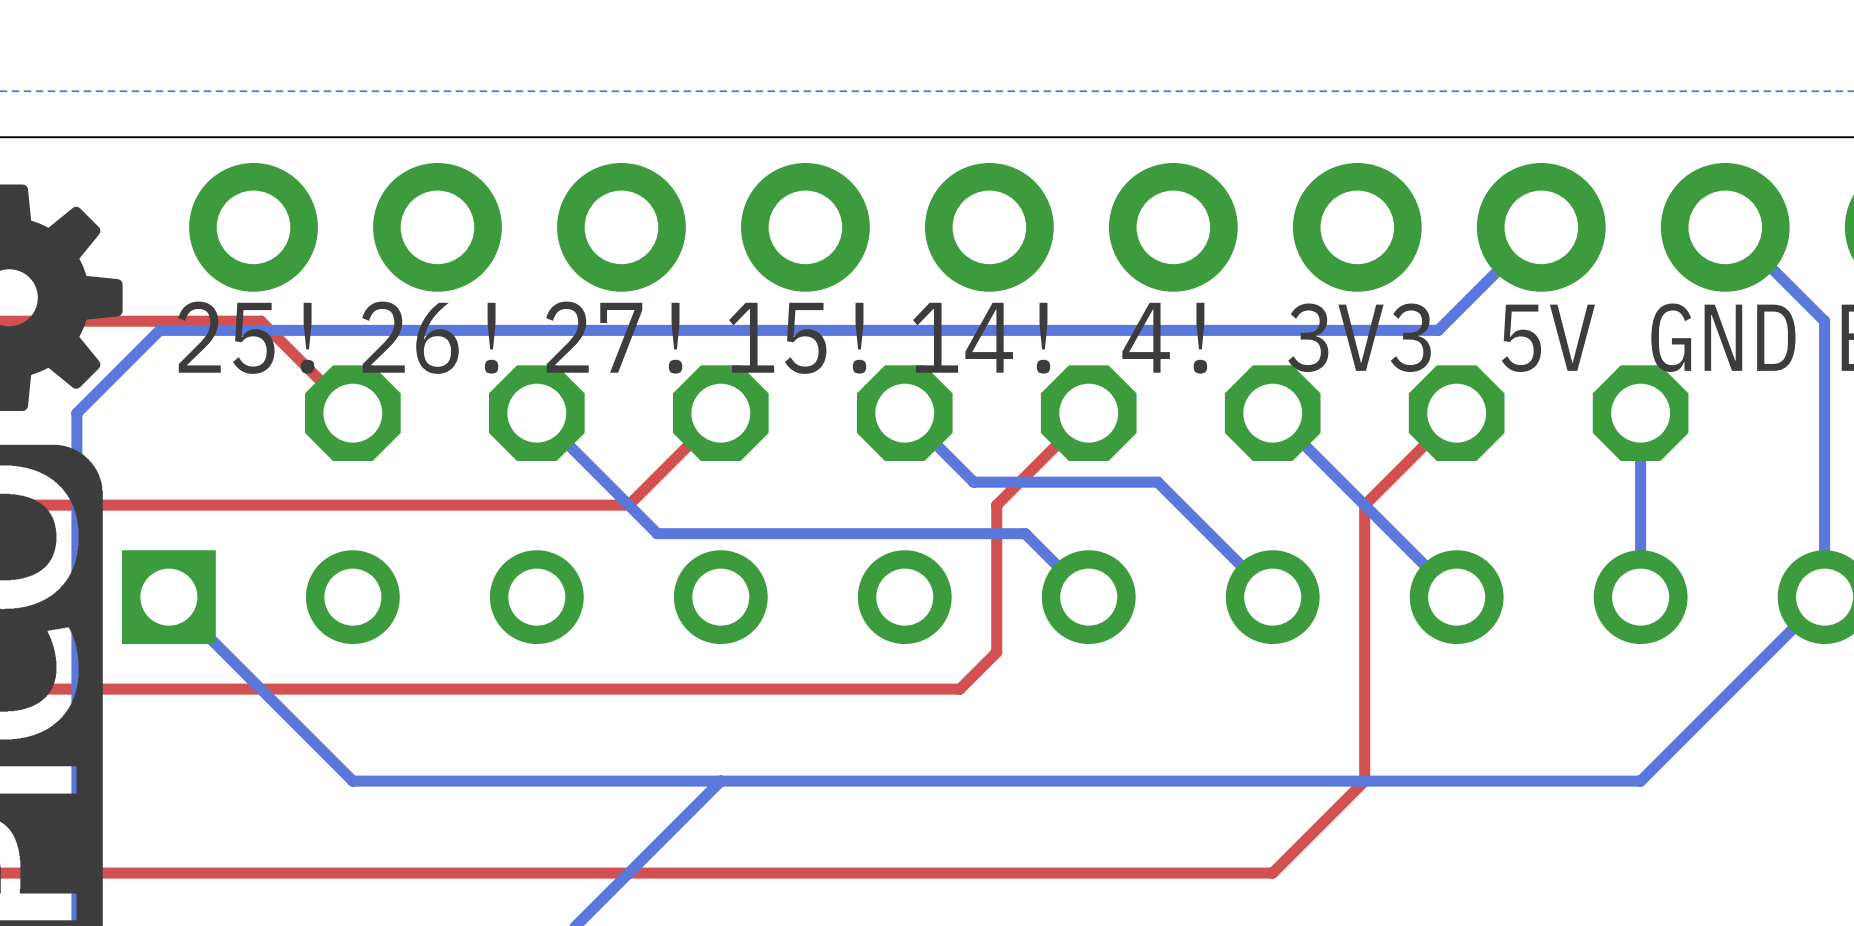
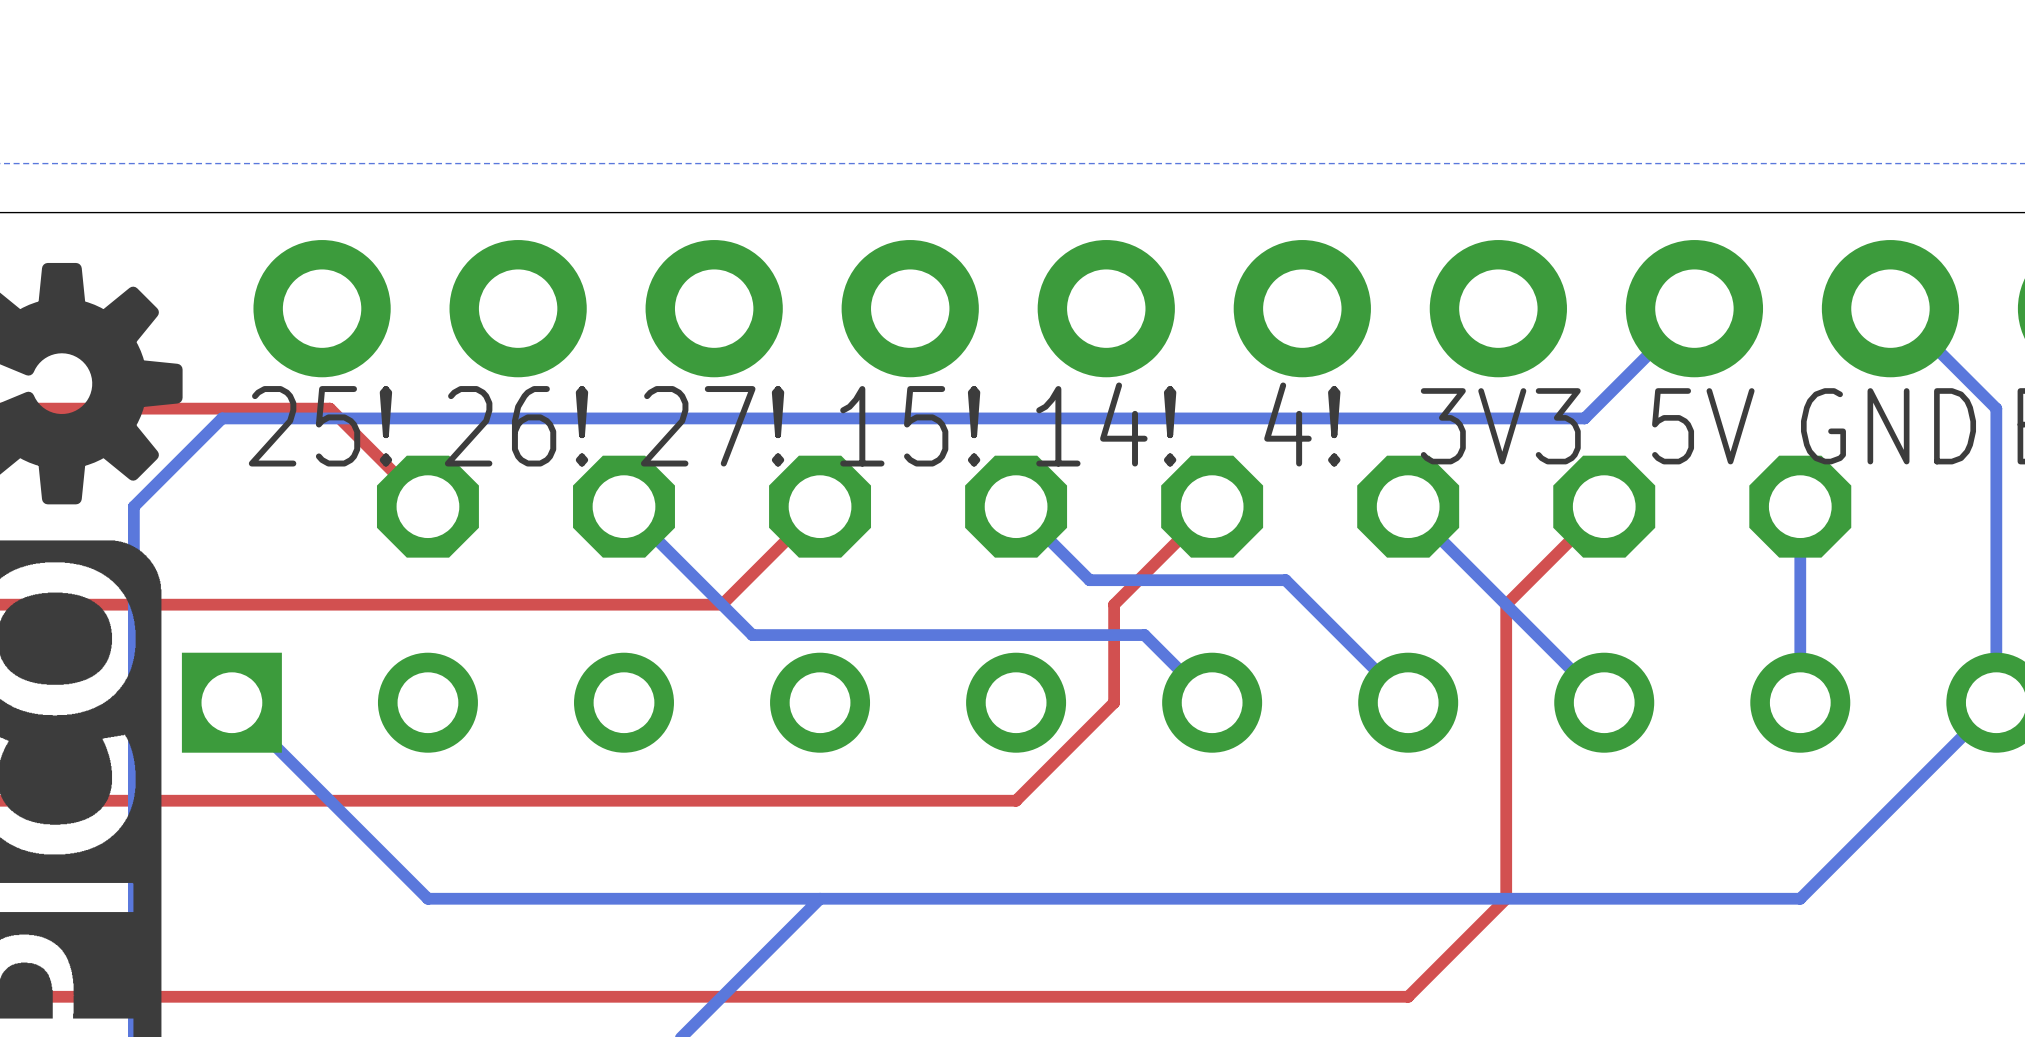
top track: (996, 597) (996, 652) (959, 689) (904, 689) -> (1114, 702) (1016, 800)

